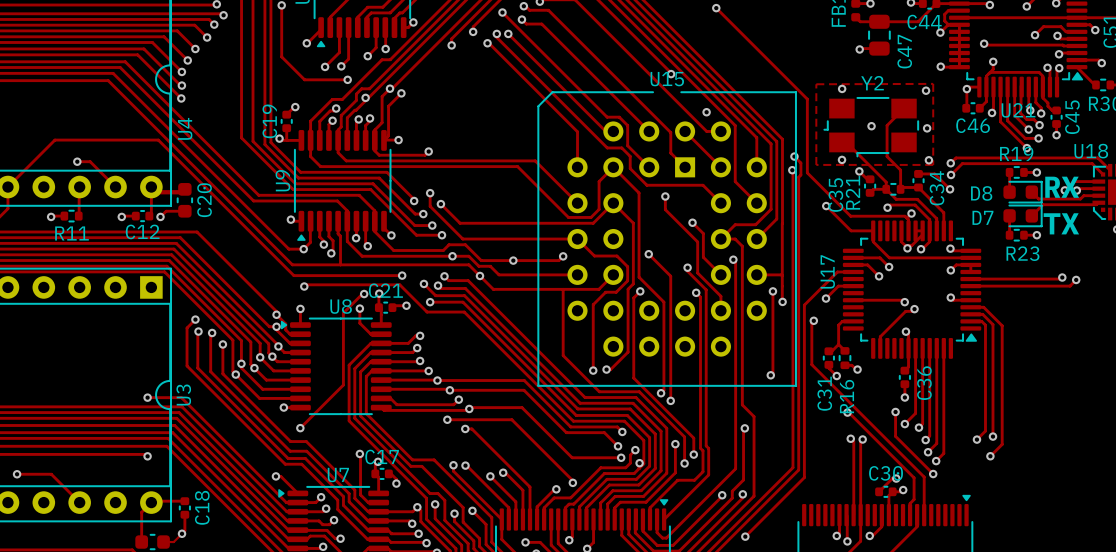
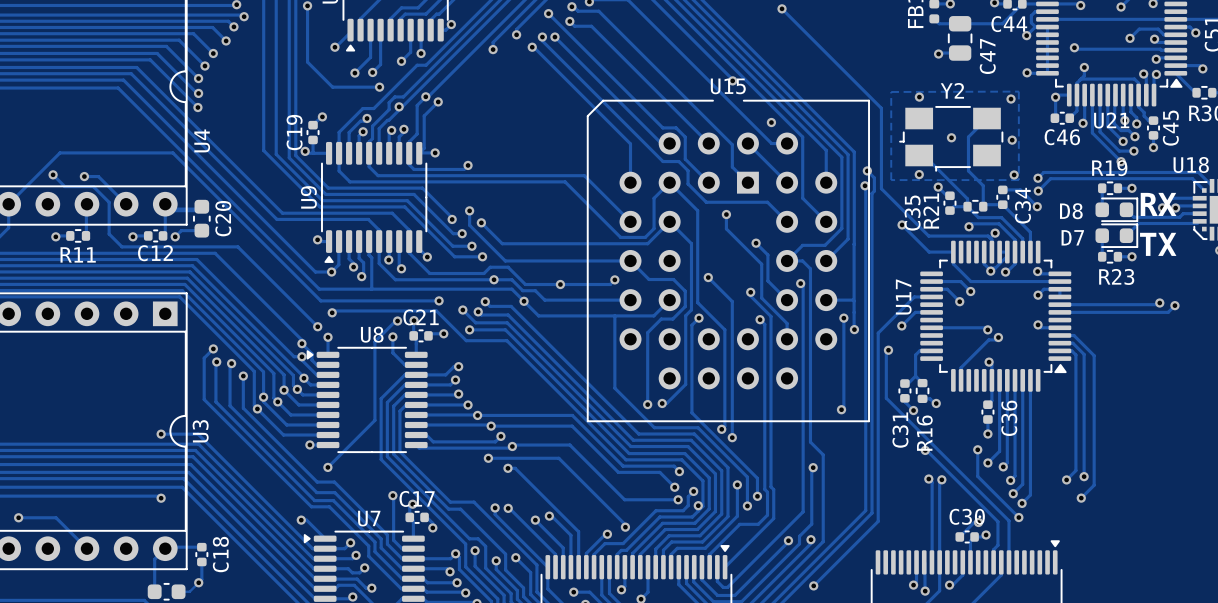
track: none -> (53, 174) (64, 186) (93, 186) (109, 202) (109, 234) (121, 246) (237, 246) (317, 326)
via: none -> (53, 174)
via: none -> (317, 326)

